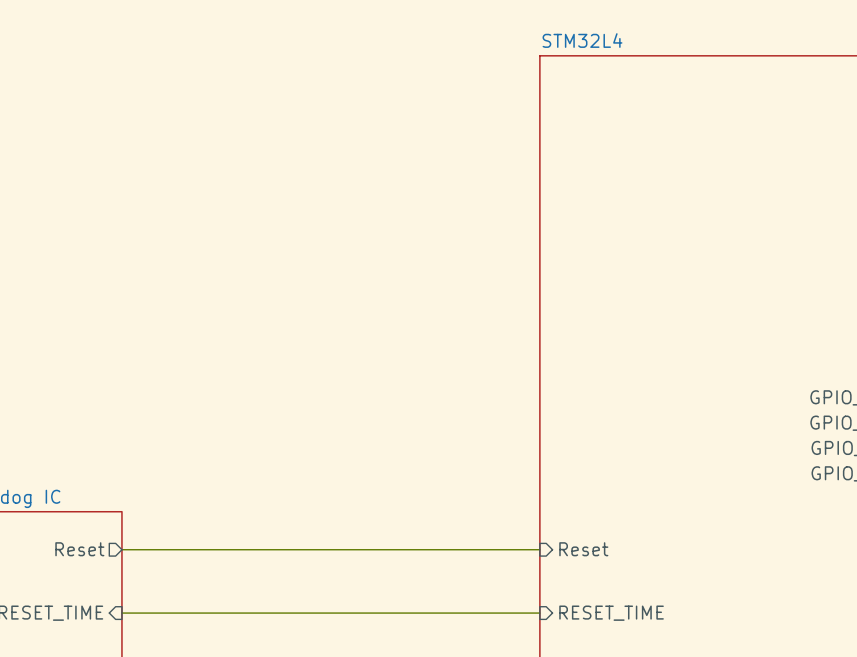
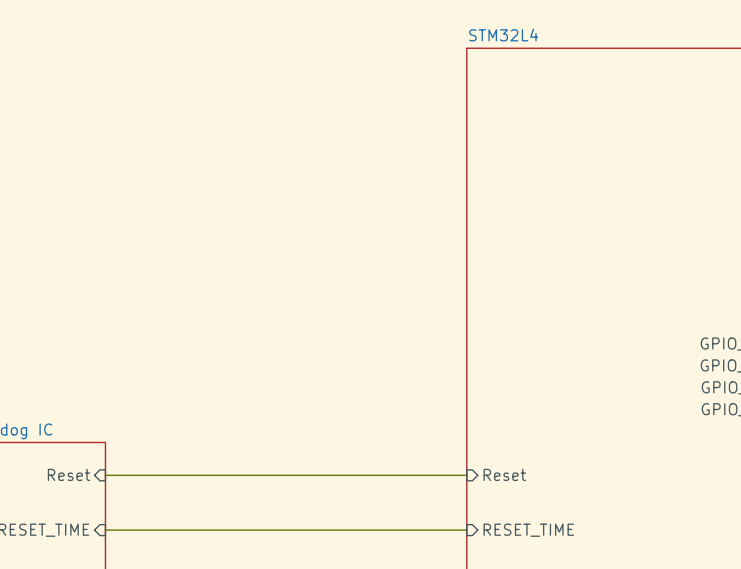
sheet pin shape: output (79, 549) -> input (69, 474)

